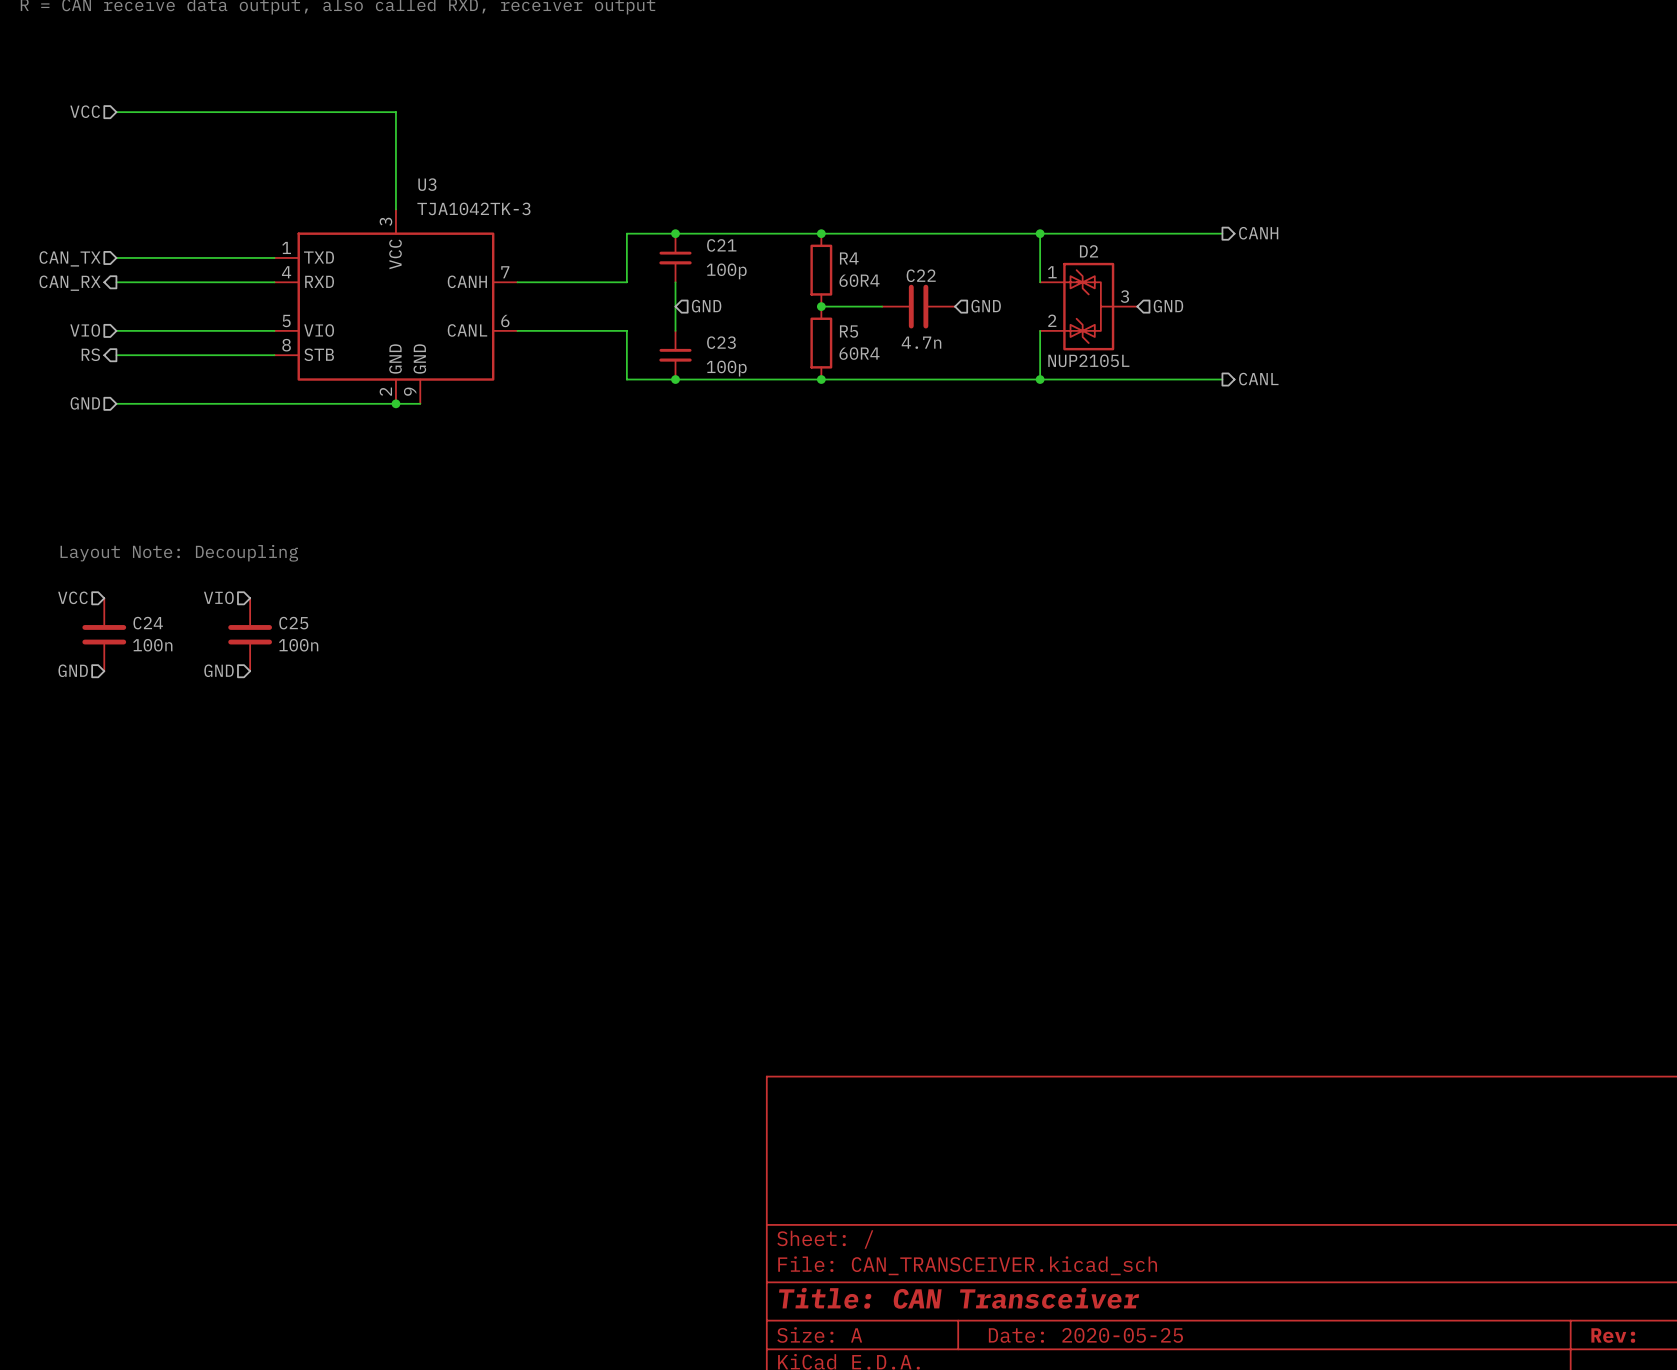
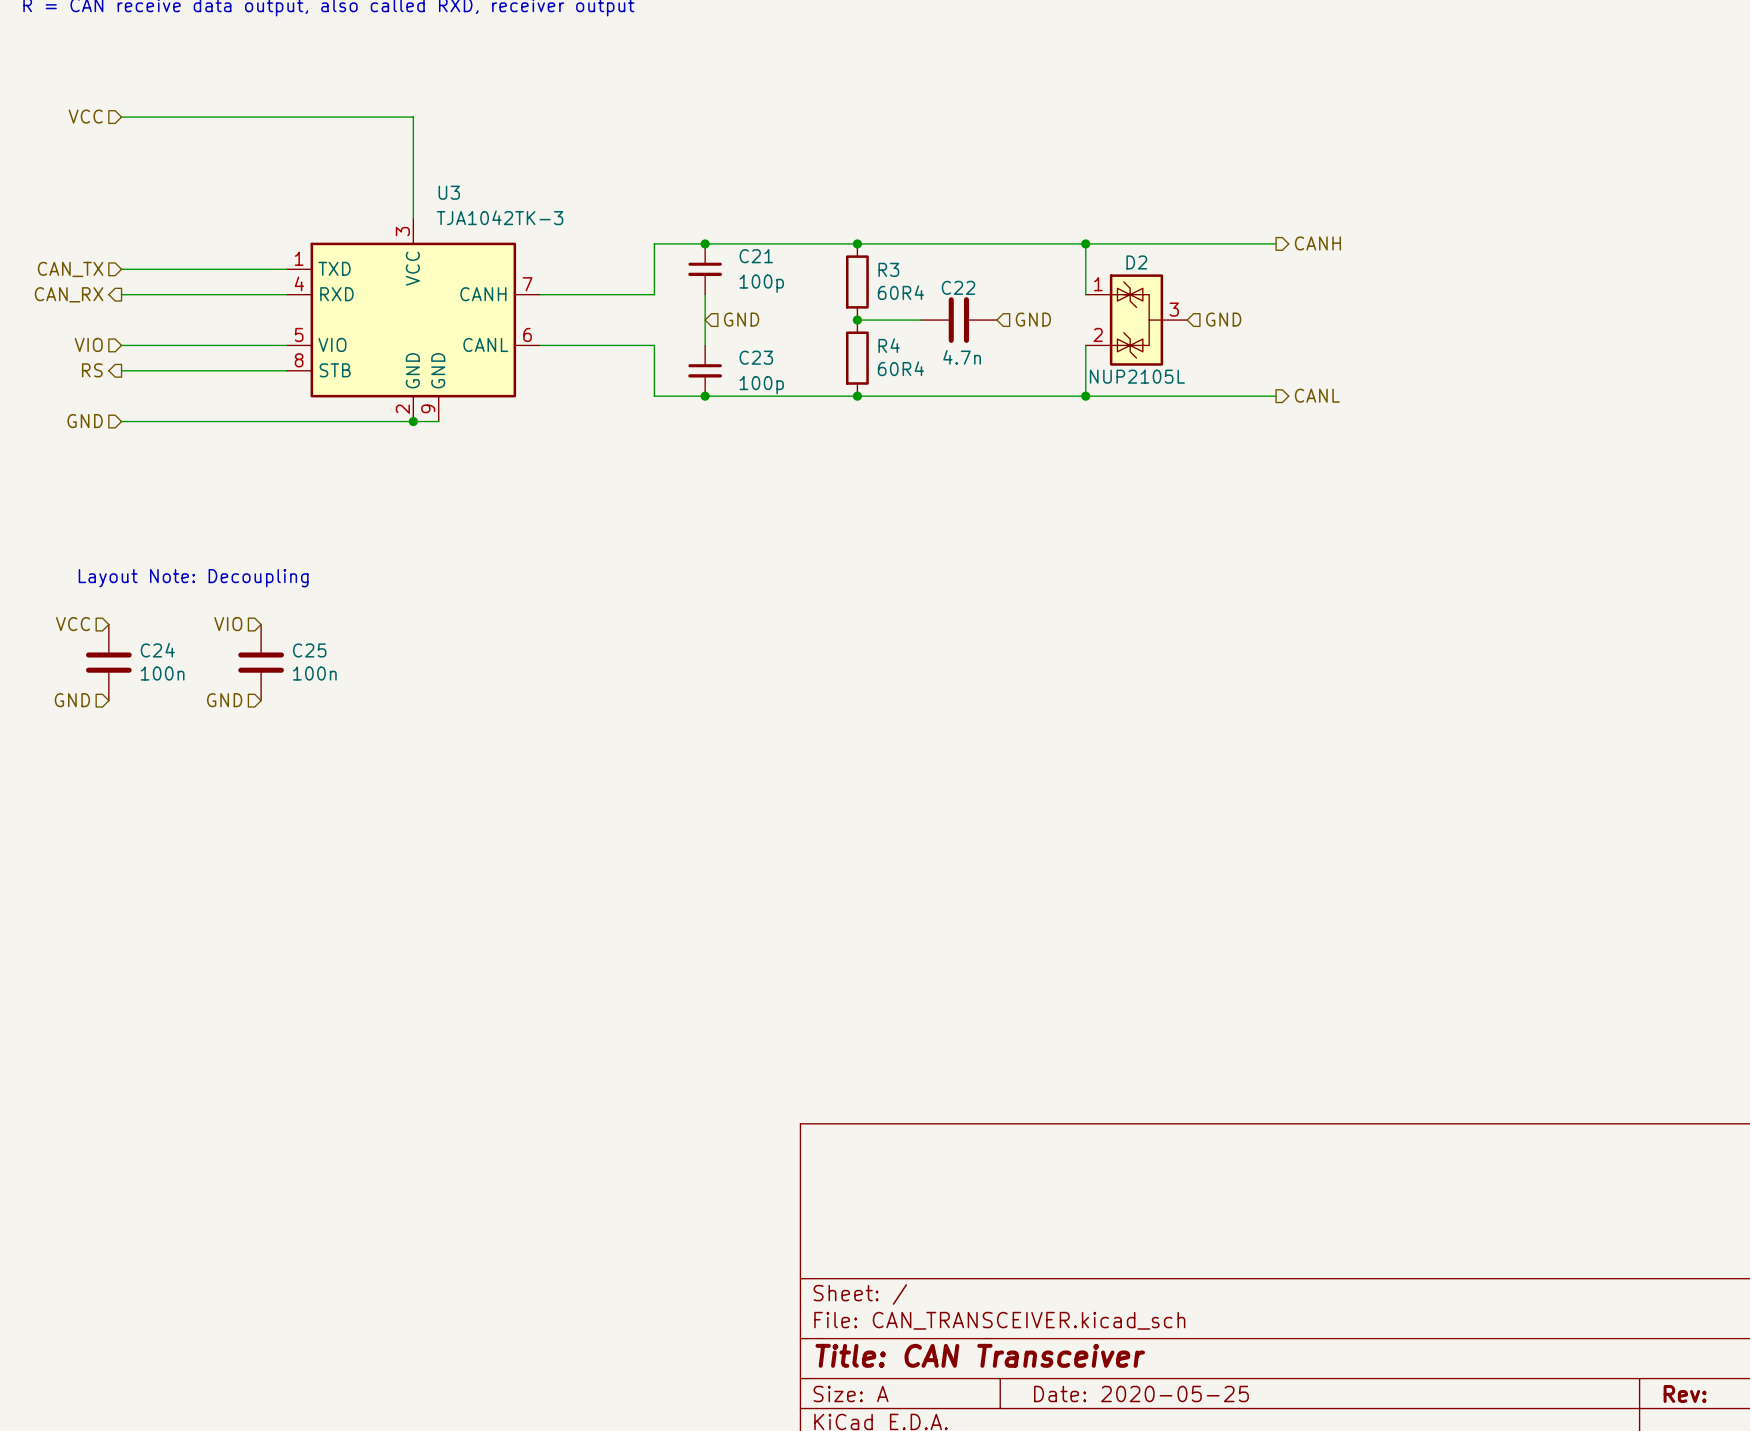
R4 name: R4 (849, 258) -> R3 (888, 269)
R5 name: R5 (849, 331) -> R4 (889, 345)

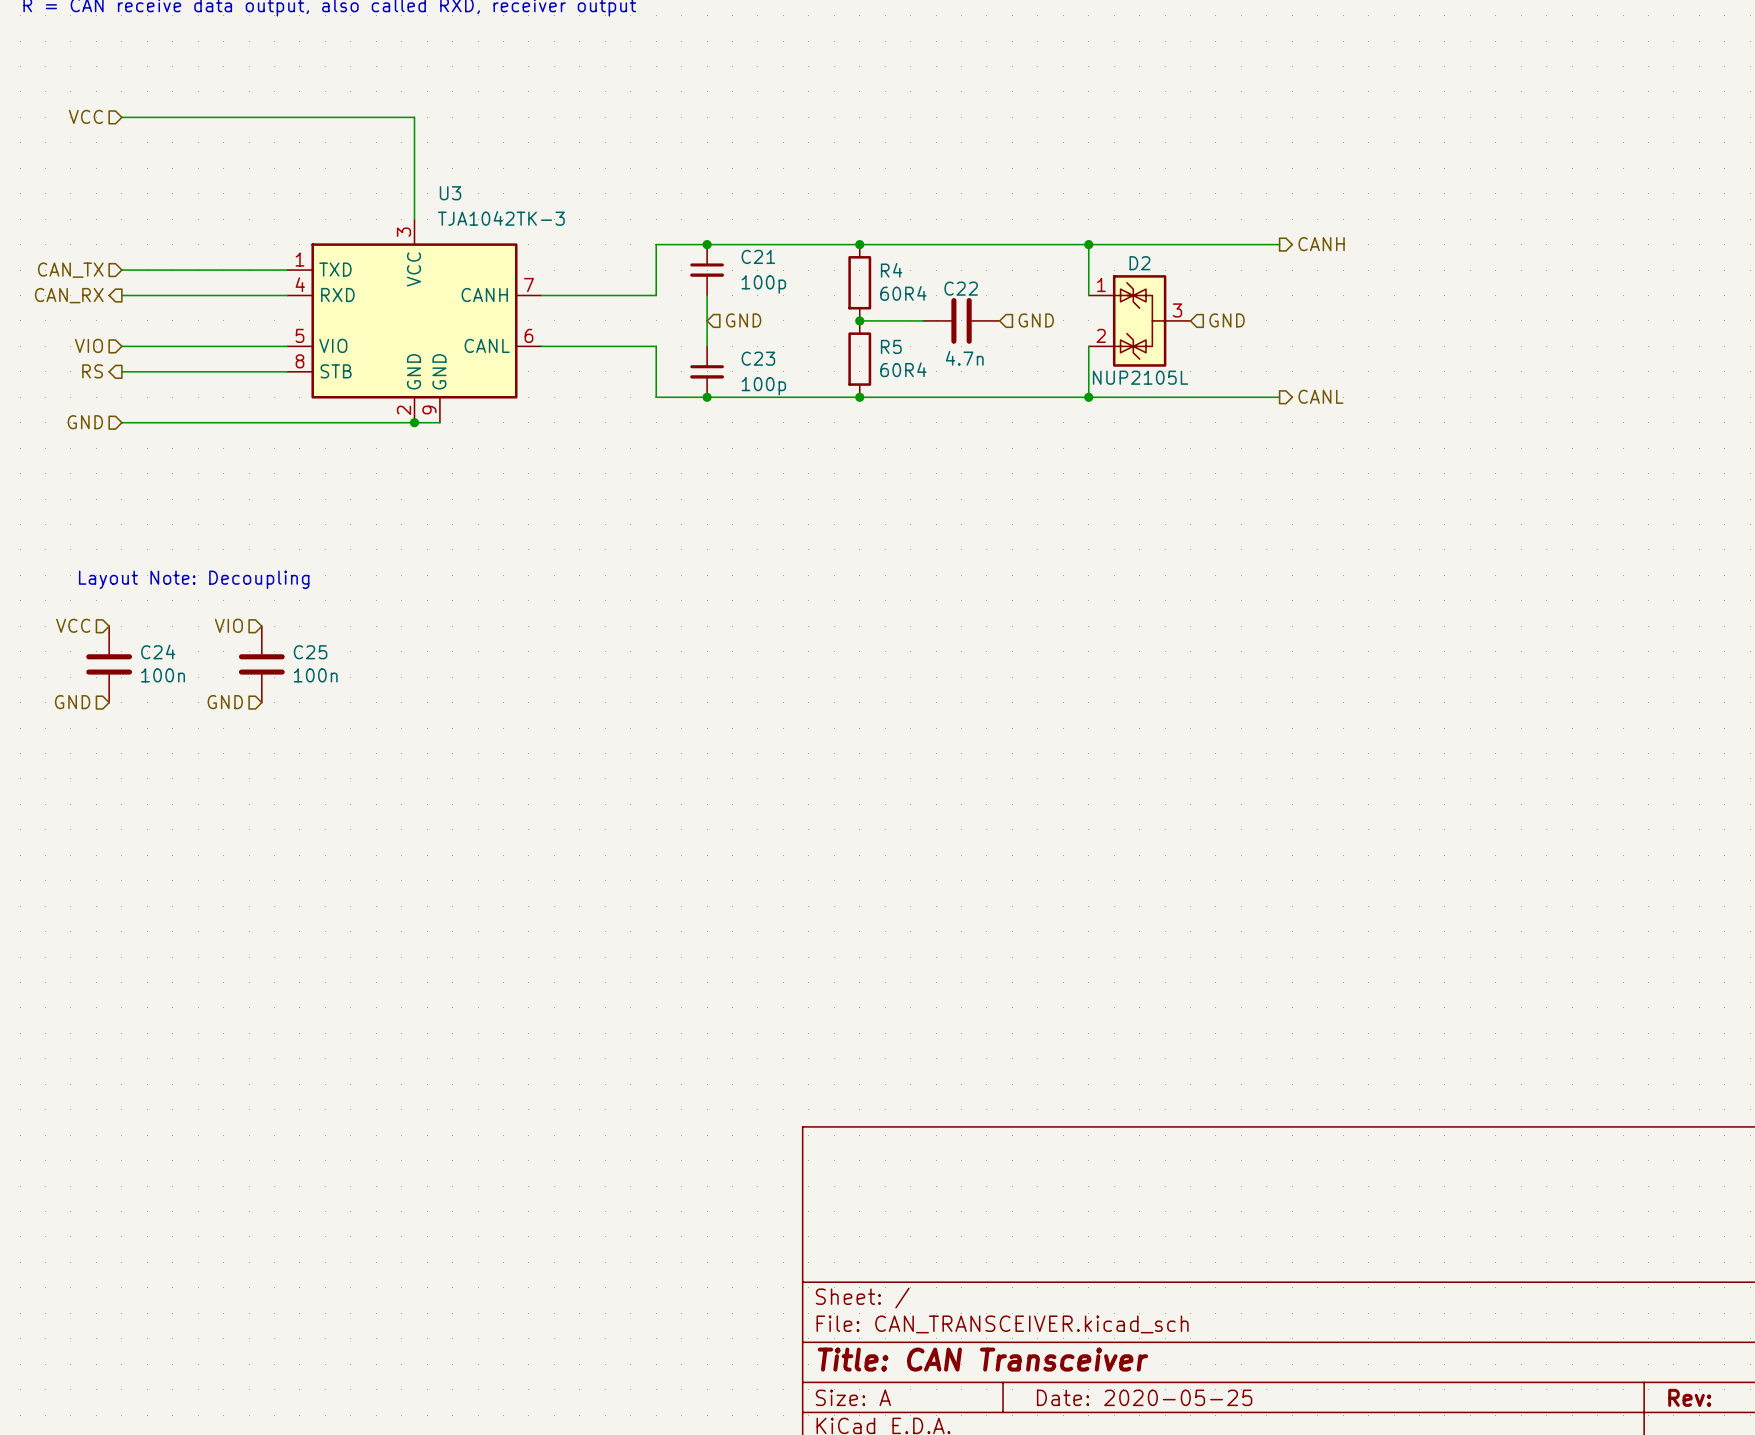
R3 name: R3 (888, 269) -> R4 (891, 270)
R4 name: R4 (889, 345) -> R5 (891, 346)

